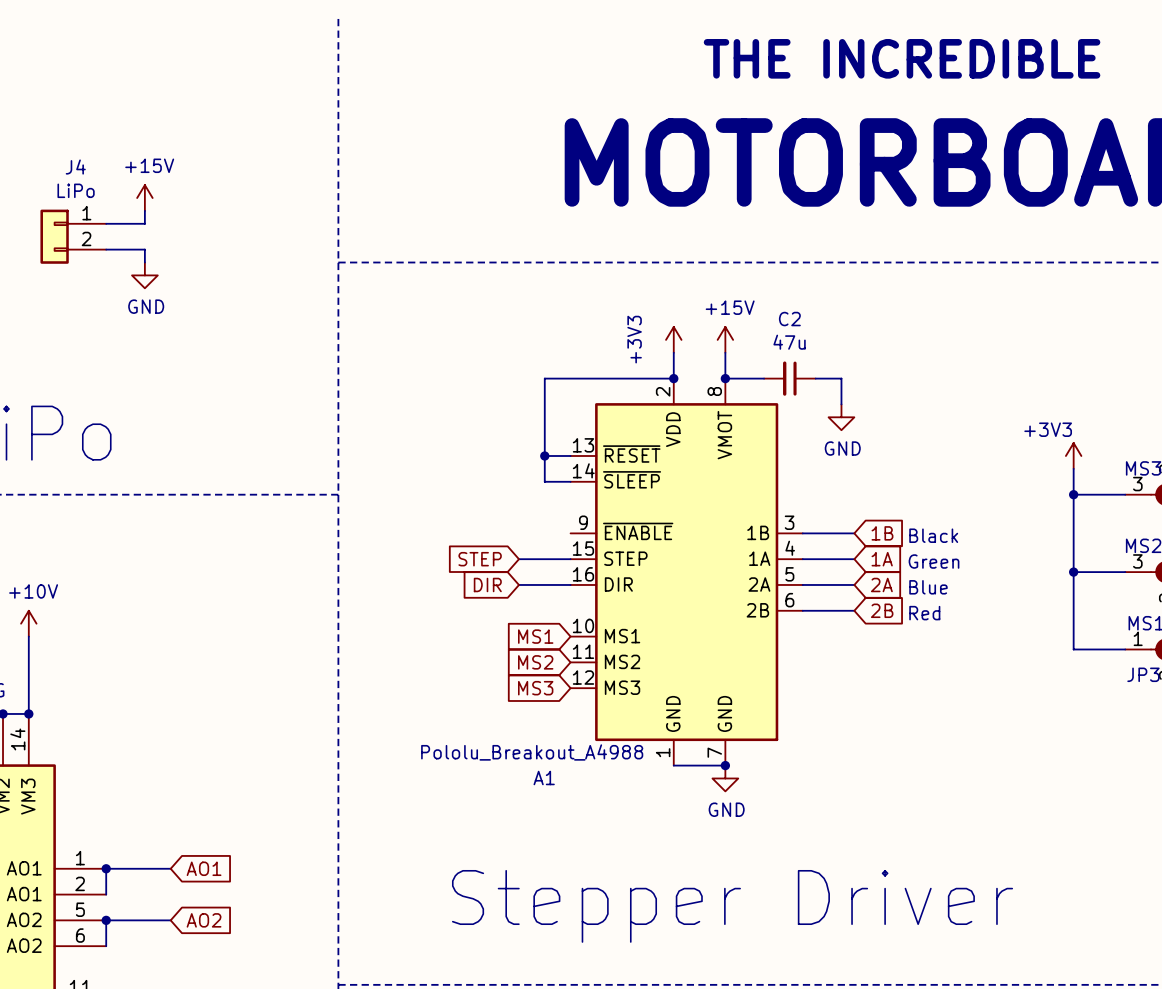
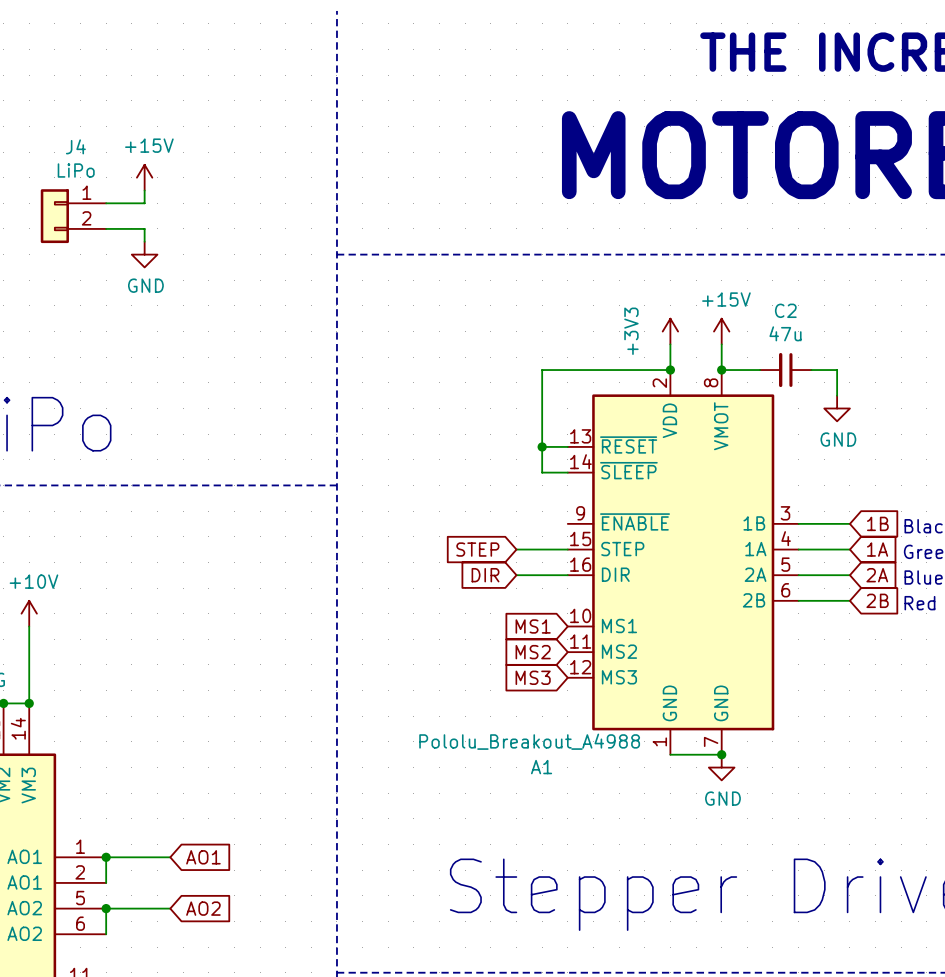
power symbol position: +15V (144, 198) -> +15V (144, 177)
wire: (144, 210) (144, 223) (106, 223) -> (144, 190) (144, 203) (106, 203)
J4 position: (73, 236) -> (73, 216)
wire: (106, 249) (144, 249) (144, 262) -> (106, 228) (144, 228) (144, 241)
power symbol position: GND (144, 275) -> GND (144, 254)

